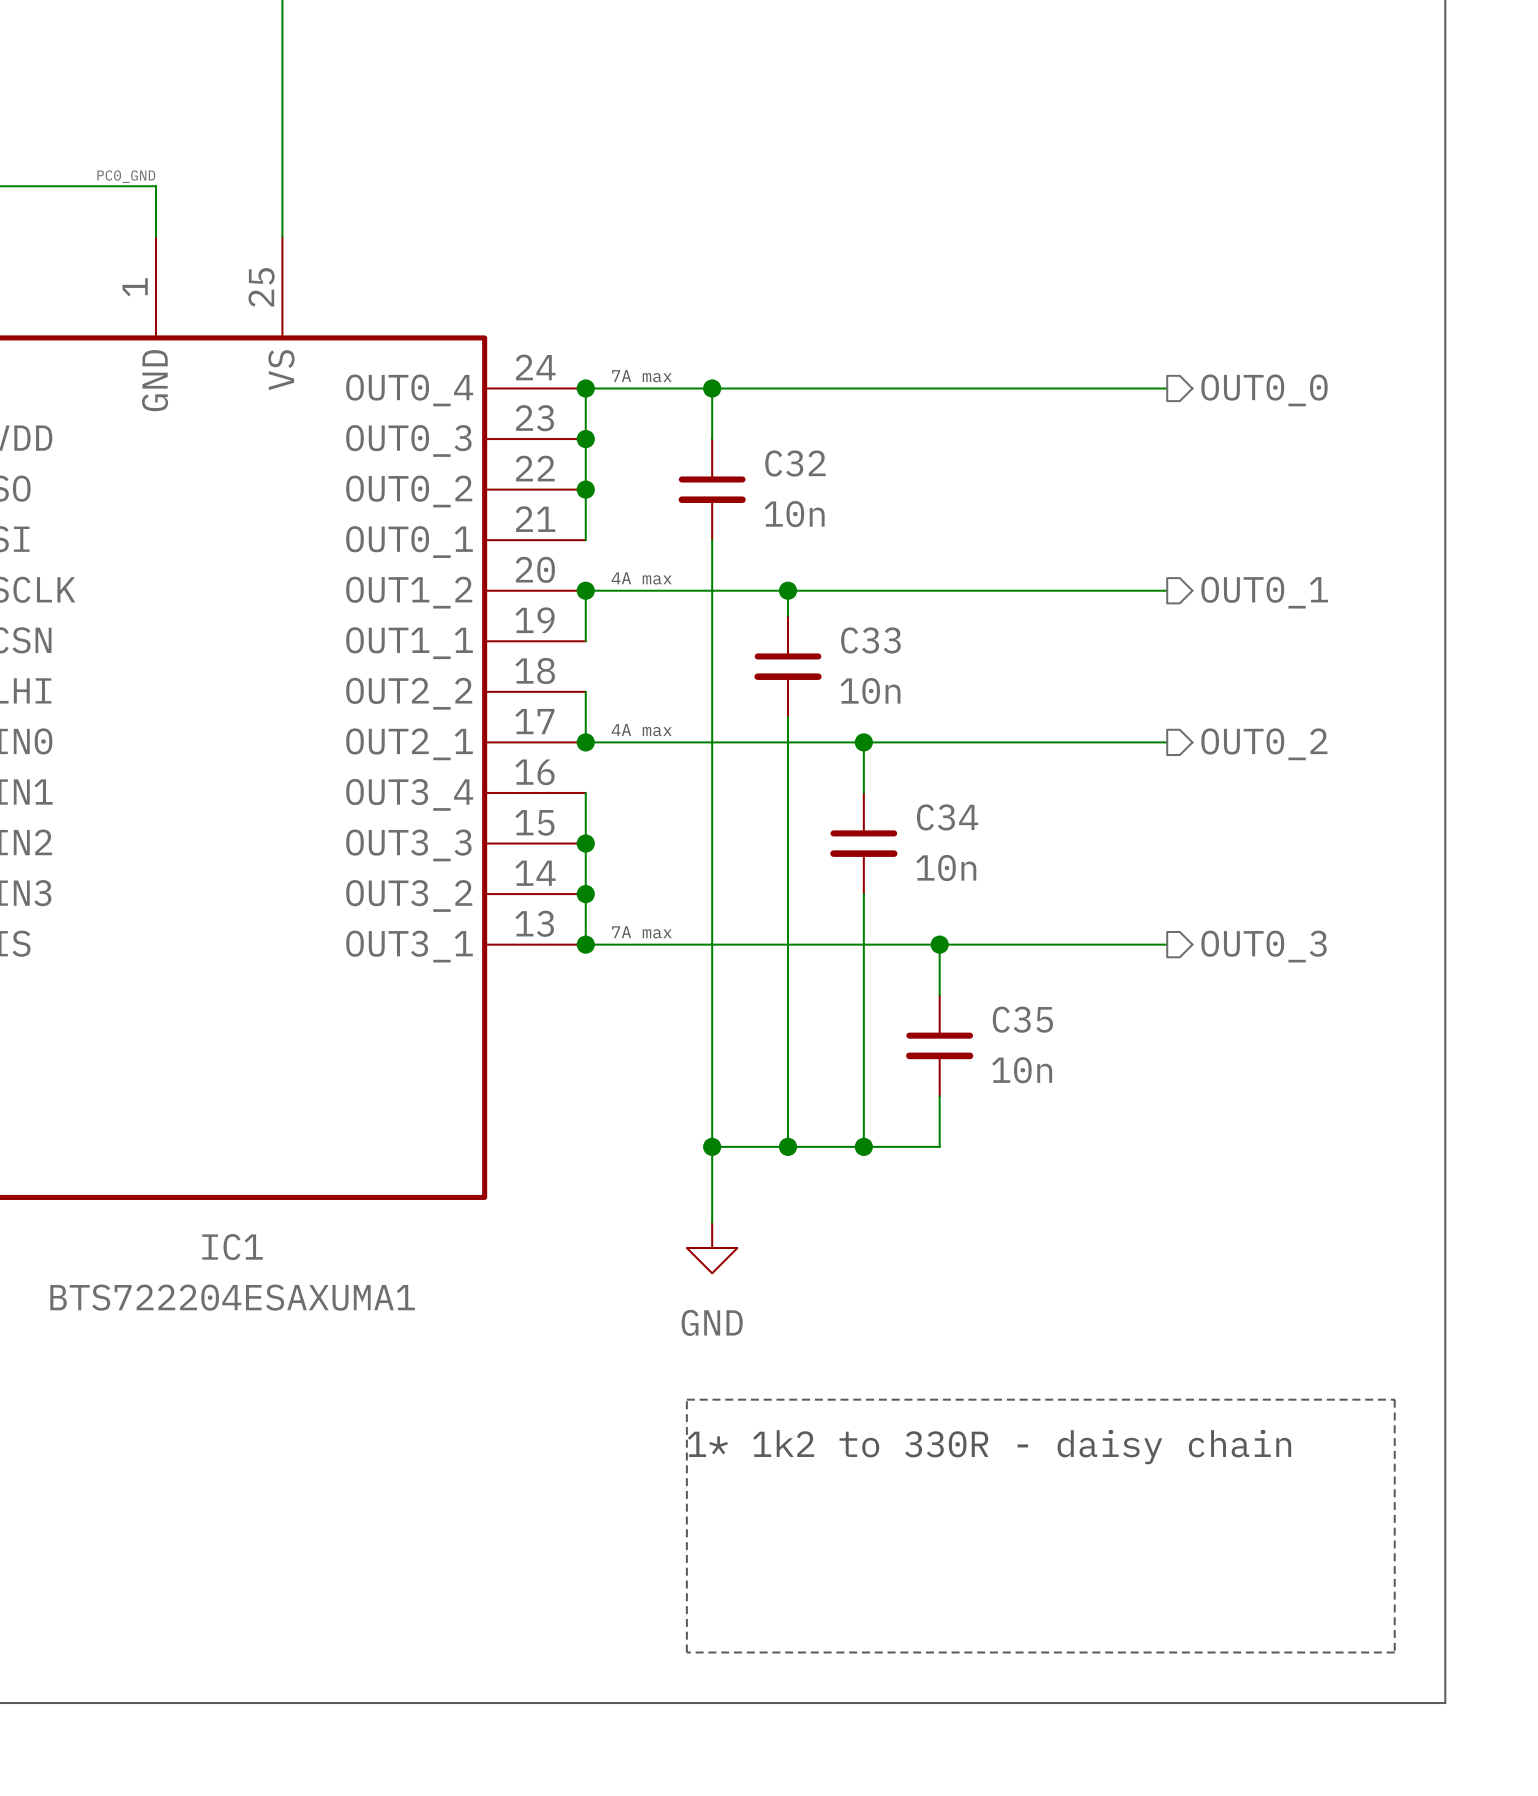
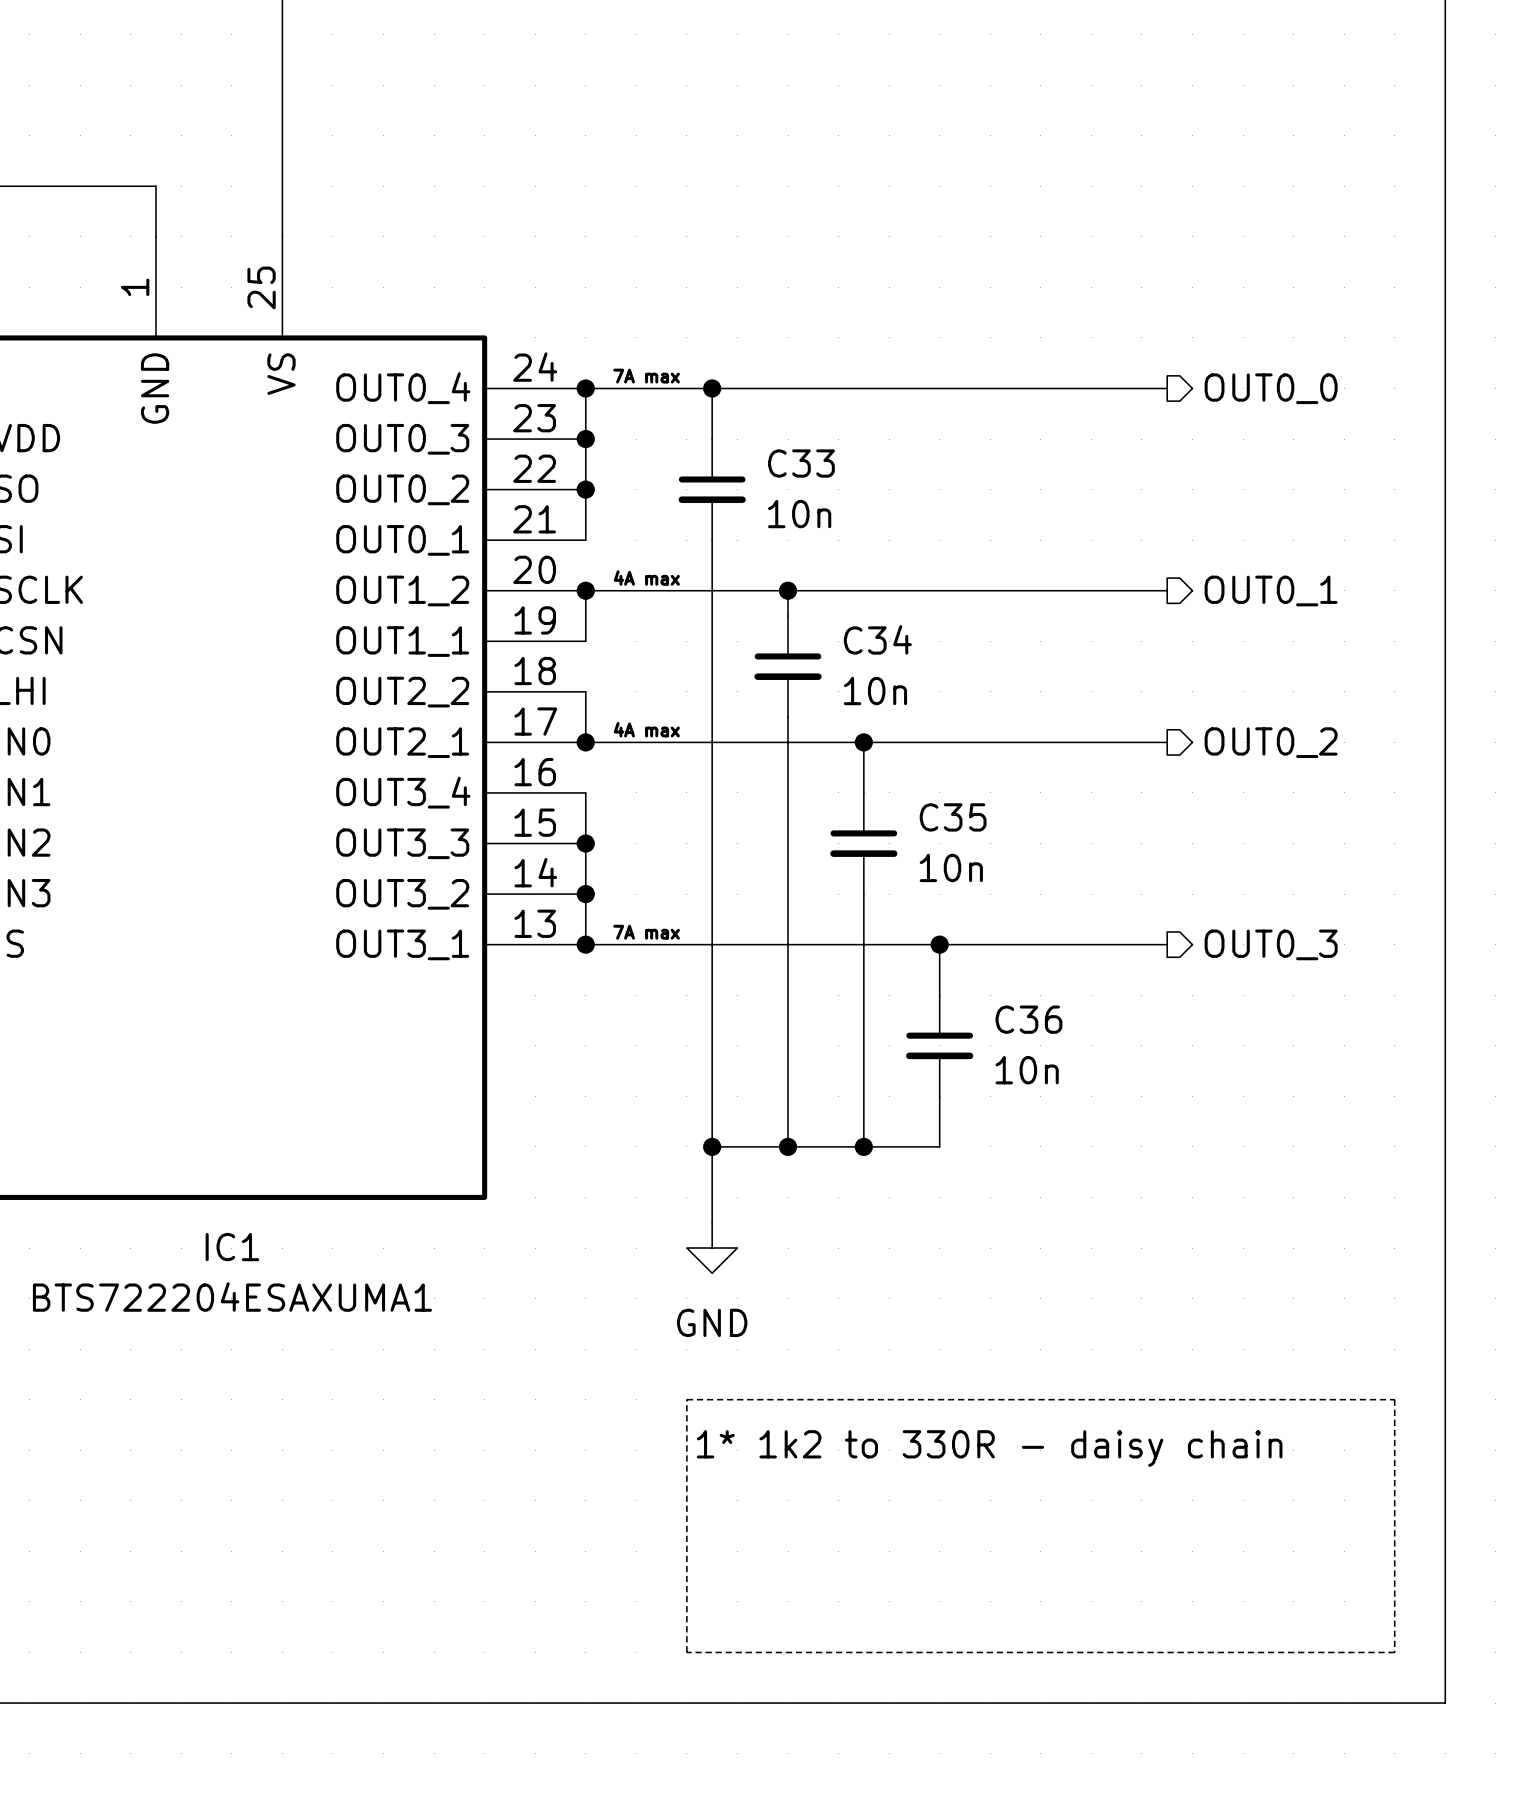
label: PC0_GND (126, 176) -> none
C32 name: C32 (795, 463) -> C33 (801, 463)
C33 name: C33 (870, 640) -> C34 (877, 639)
C34 name: C34 (947, 817) -> C35 (953, 817)
C35 name: C35 (1022, 1019) -> C36 (1028, 1019)

